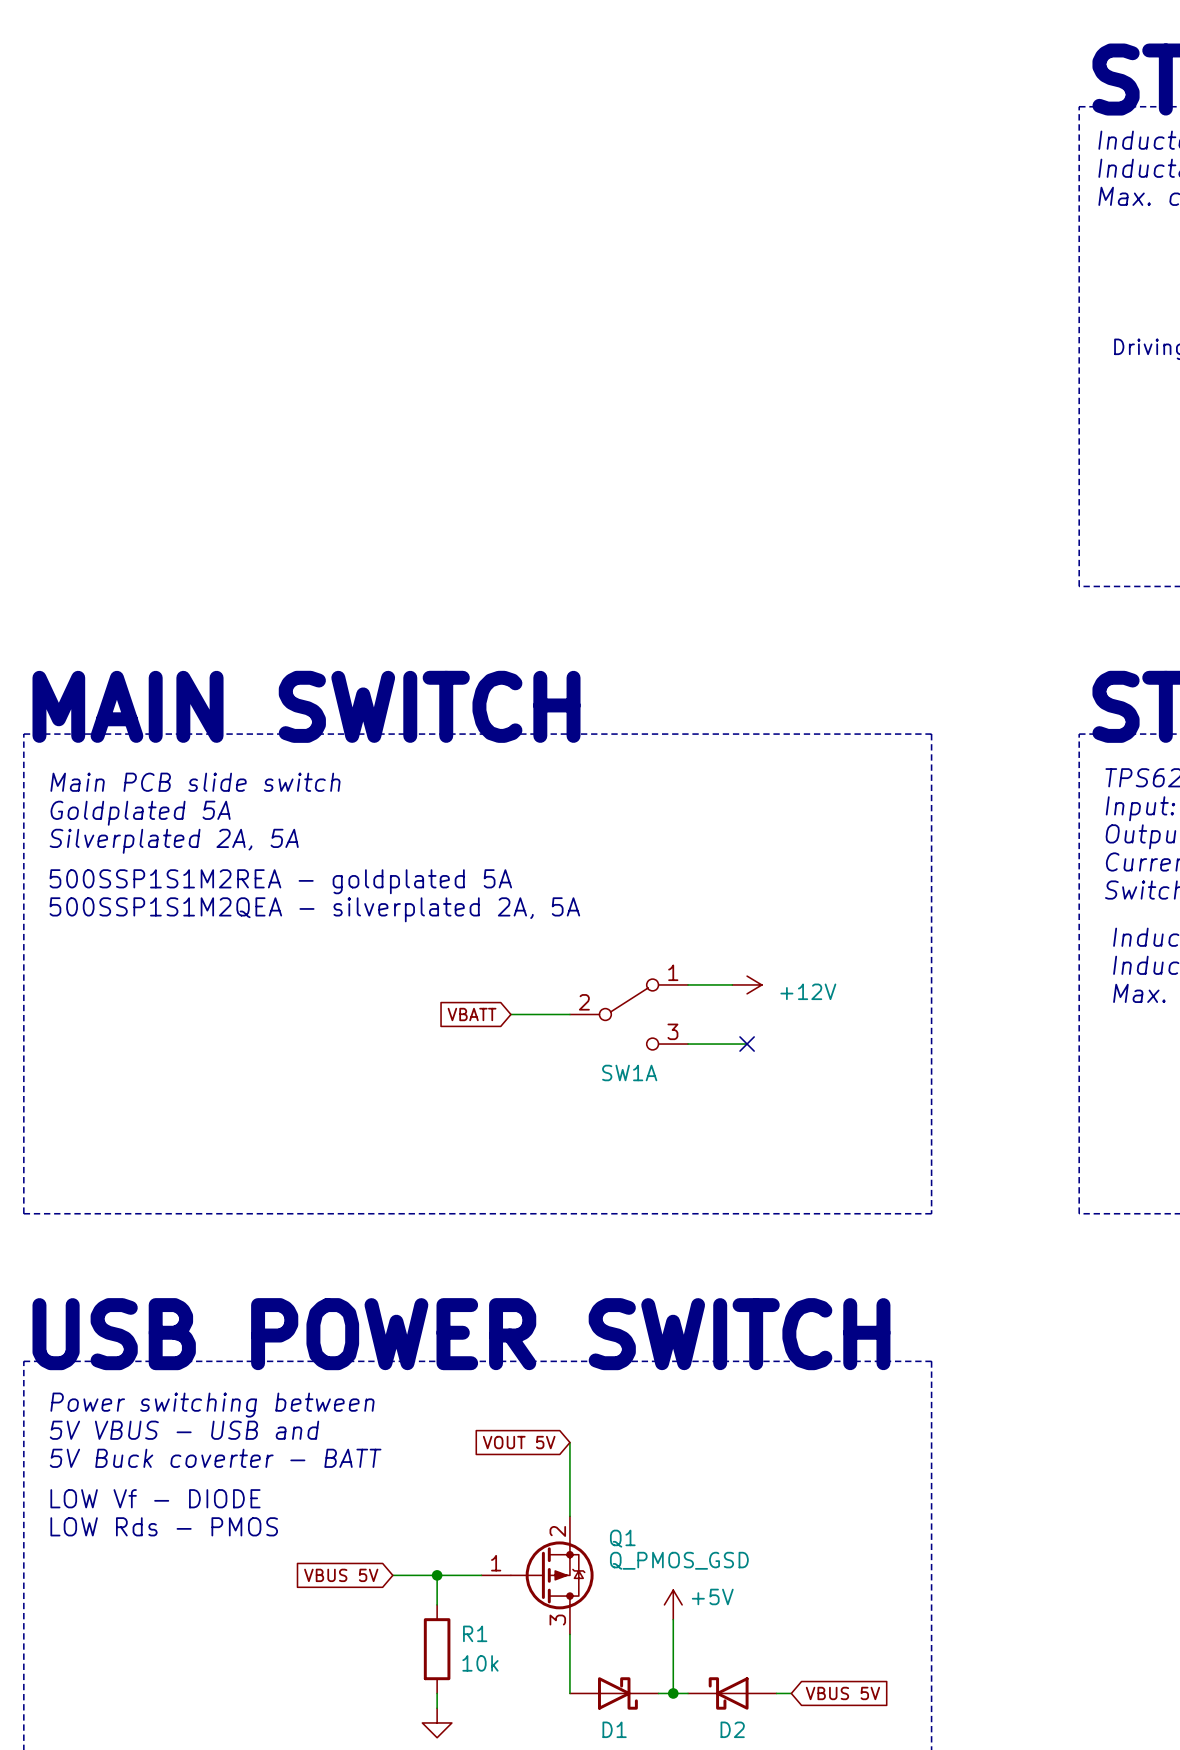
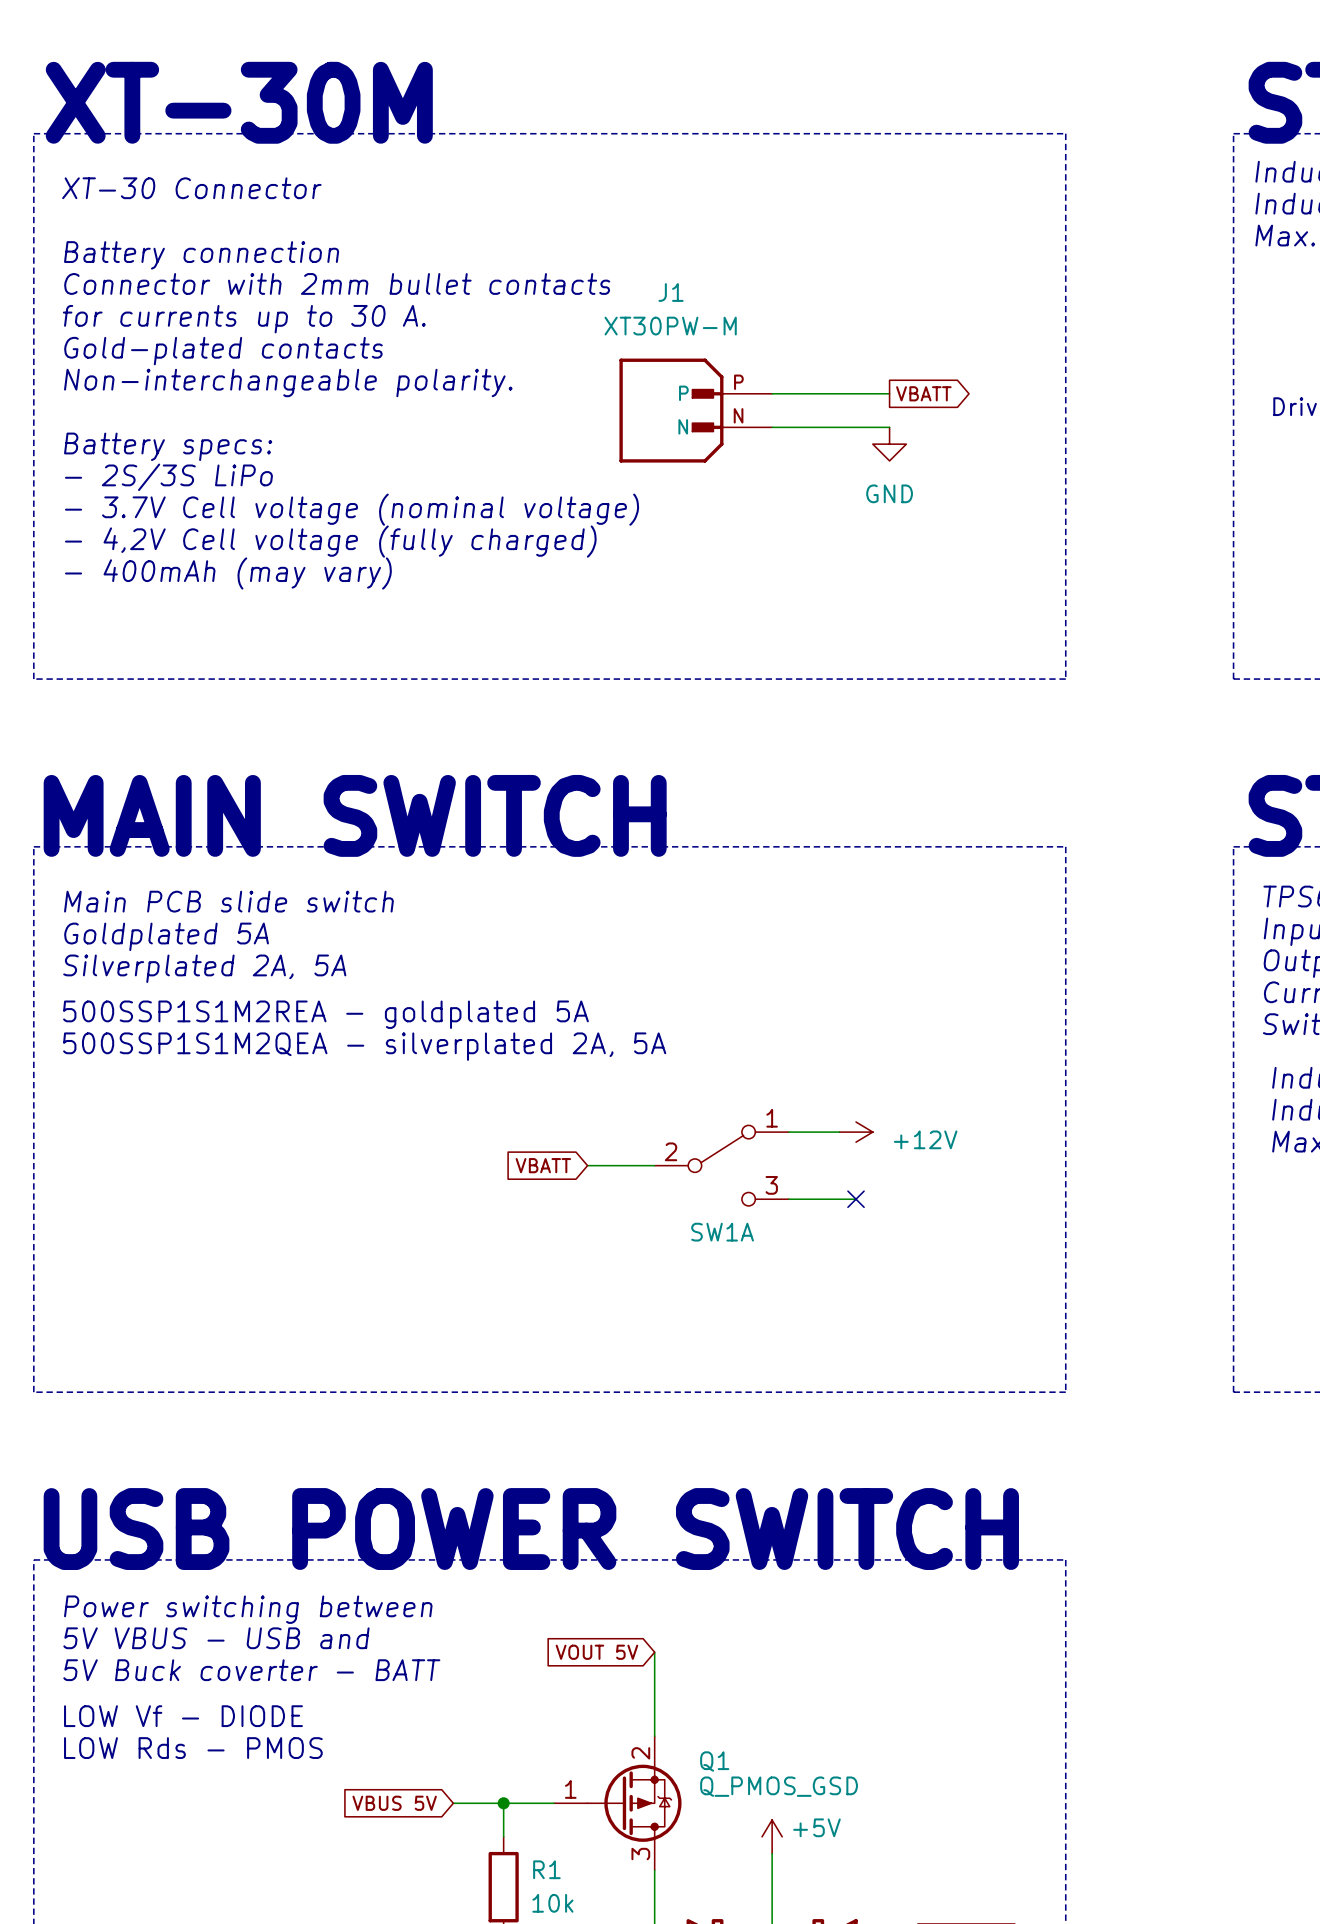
text: none -> XT-30M (239, 102)
line: none -> (33, 133) (1065, 133) (1065, 679) (33, 679) (33, 133)
text: none -> XT-30 Connector (191, 188)
text: none -> Battery connection (201, 255)
text: none -> Connector with 2mm bullet contacts (337, 283)
text: none -> for currents up to 30 A. (244, 319)
text: none -> Gold-plated contacts (223, 351)
text: none -> Non-interchangeable polarity. (288, 382)
wire: none -> (772, 393) (889, 393)
global label: none -> VBATT (923, 393)
J1: none -> XT30PW-M (695, 410)
wire: none -> (772, 427) (889, 427)
power symbol: none -> GND (889, 444)
text: none -> Battery specs: (168, 446)
text: none -> - 2S/3S LiPo (168, 477)
text: none -> - 3.7V Cell voltage (nominal voltage) (352, 509)
text: none -> - 4,2V Cell voltage (fully charged) (330, 541)
text: none -> - 400mAh (may vary) (228, 573)

